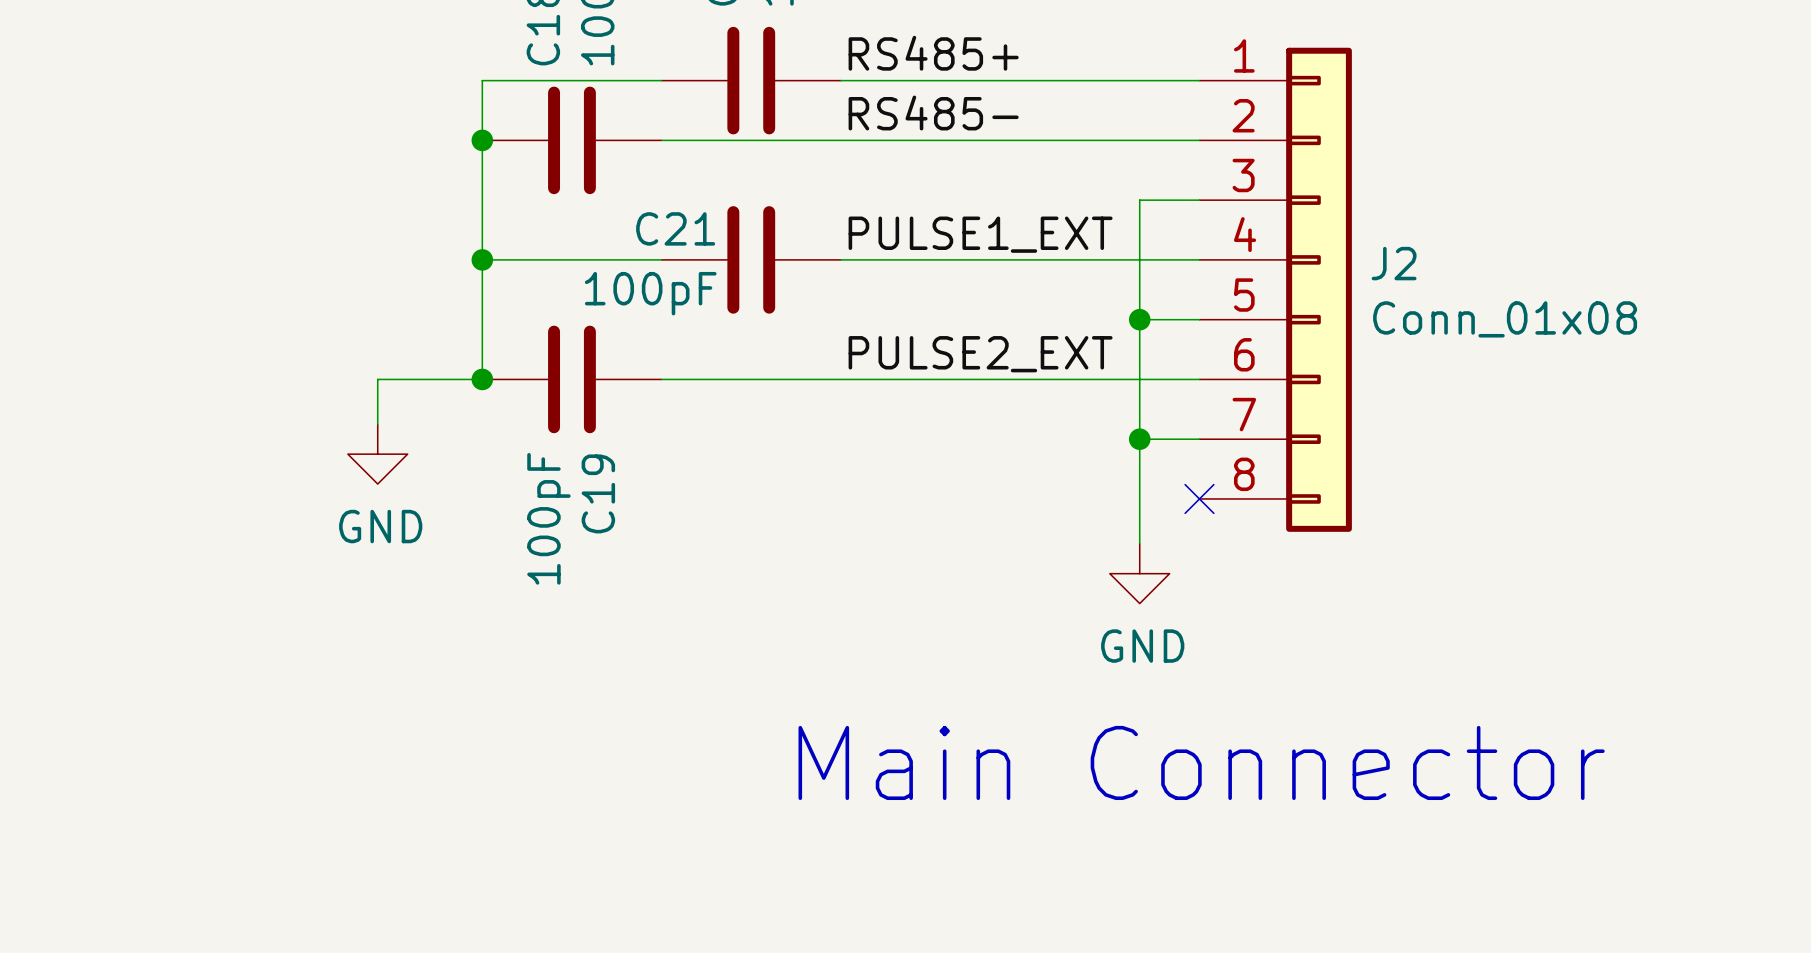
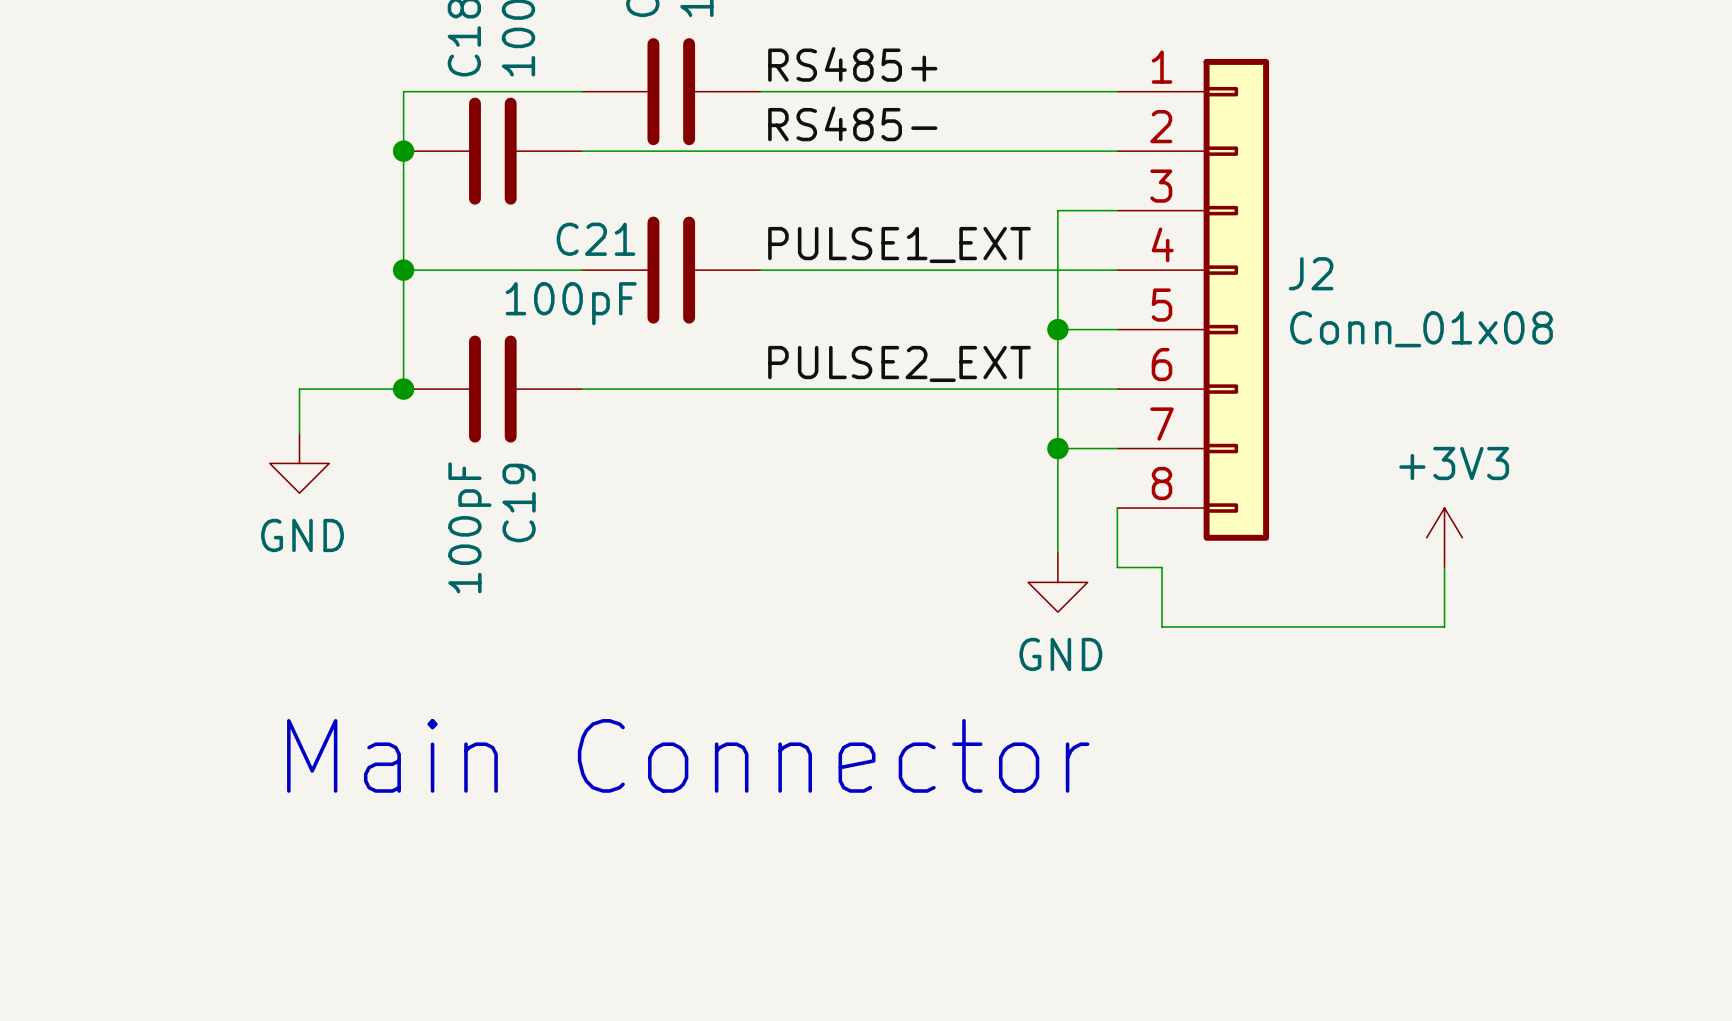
wire: none -> (1117, 508) (1117, 567) (1161, 567) (1161, 627) (1444, 627) (1444, 567)
no-connect mark: (1199, 498) -> none
power symbol: none -> +3V3 (1444, 537)
text position: Main Connector (1201, 762) -> Main Connector (688, 755)

